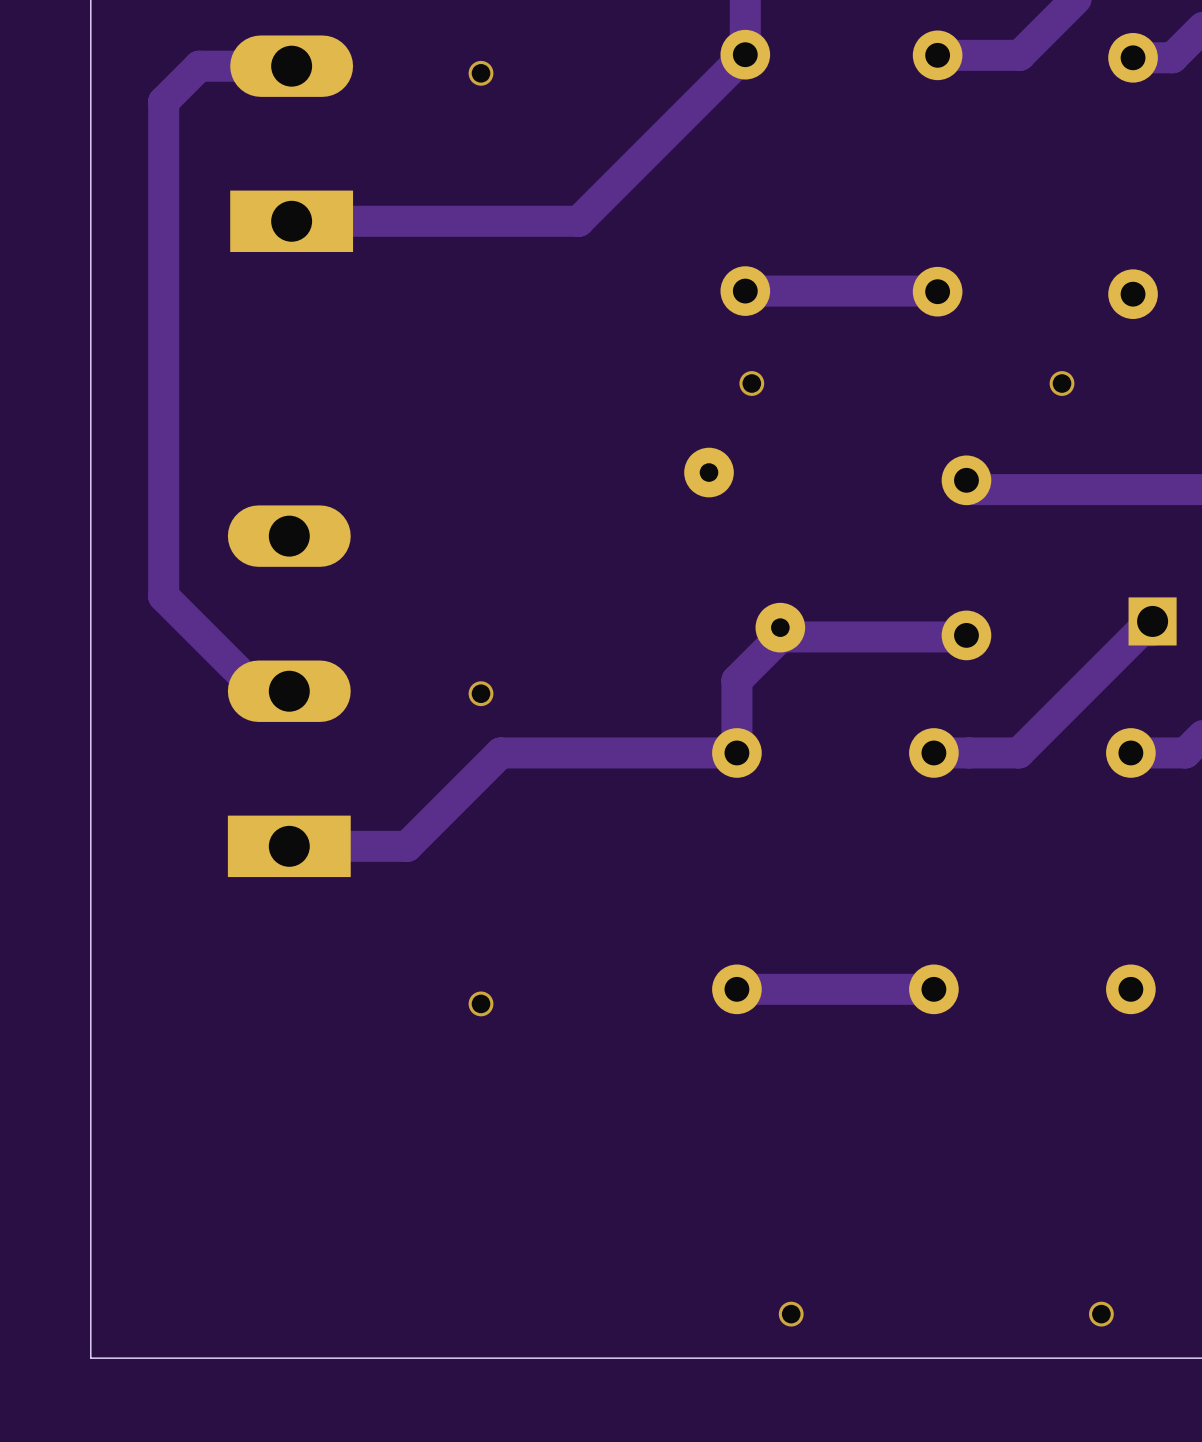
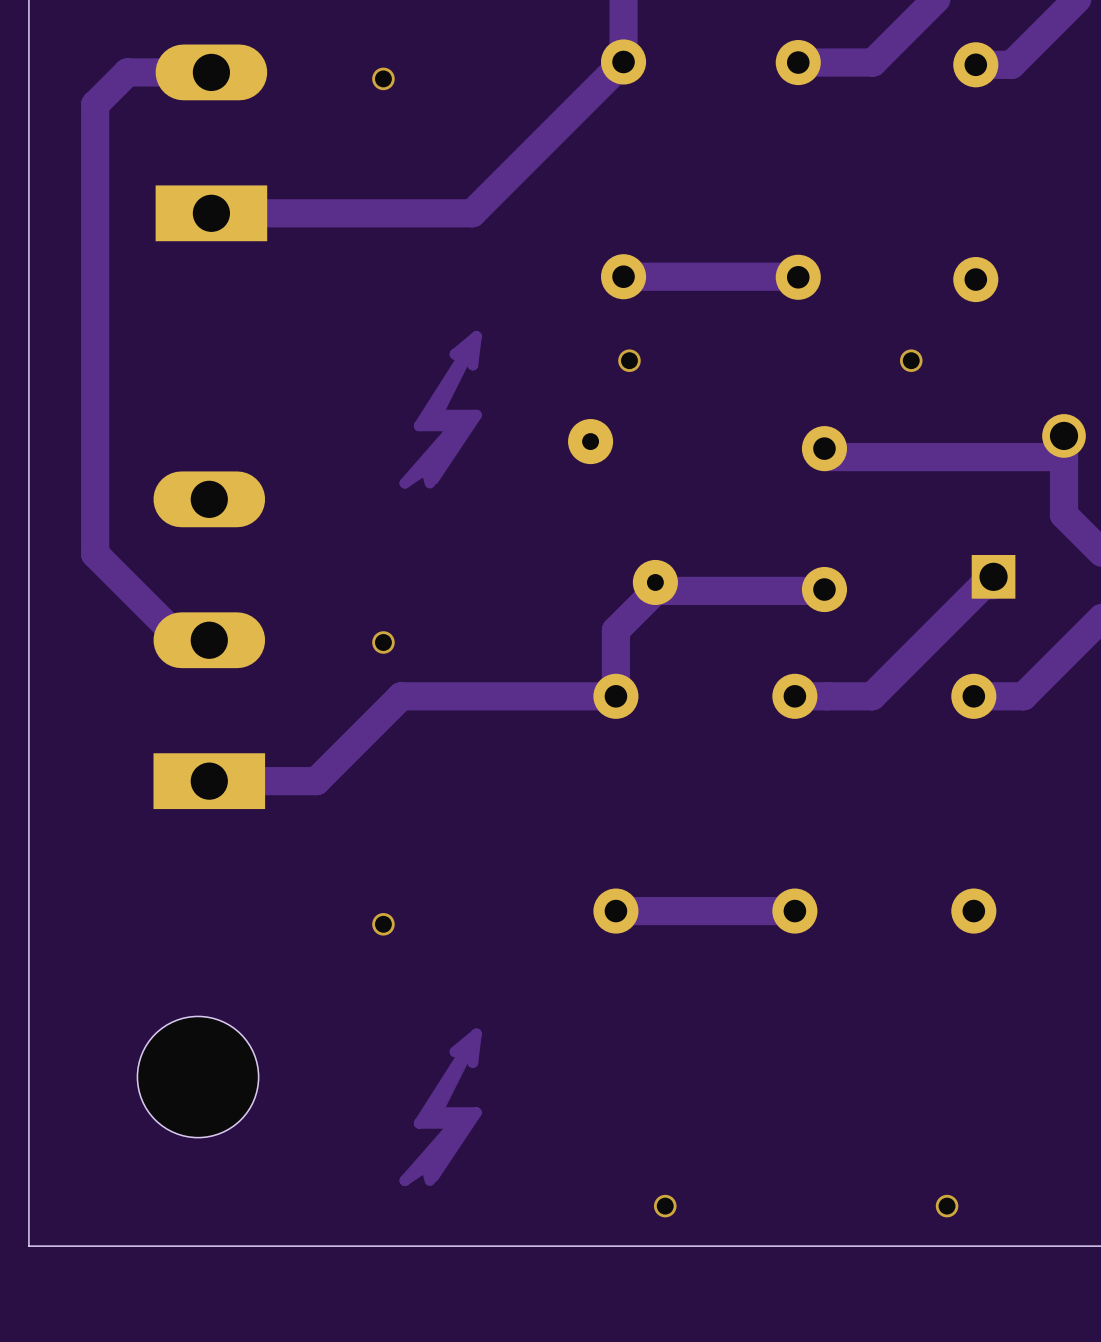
drawing: none -> [399, 331, 482, 489]
drawing: none -> [399, 1028, 482, 1186]
part: none -> (198, 1077)

